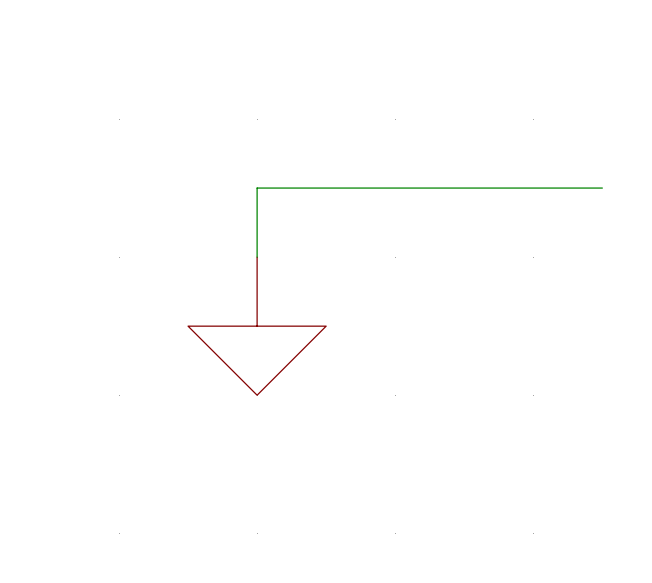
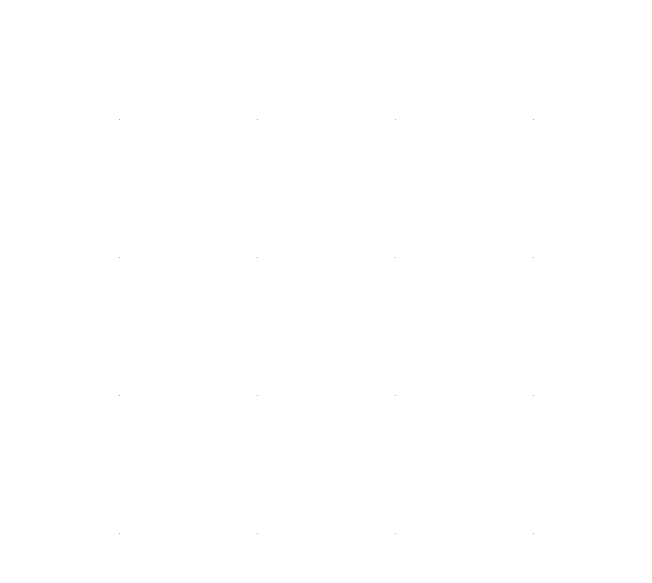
wire: (602, 188) (257, 188) (257, 257) -> none
power symbol: (257, 326) -> none

